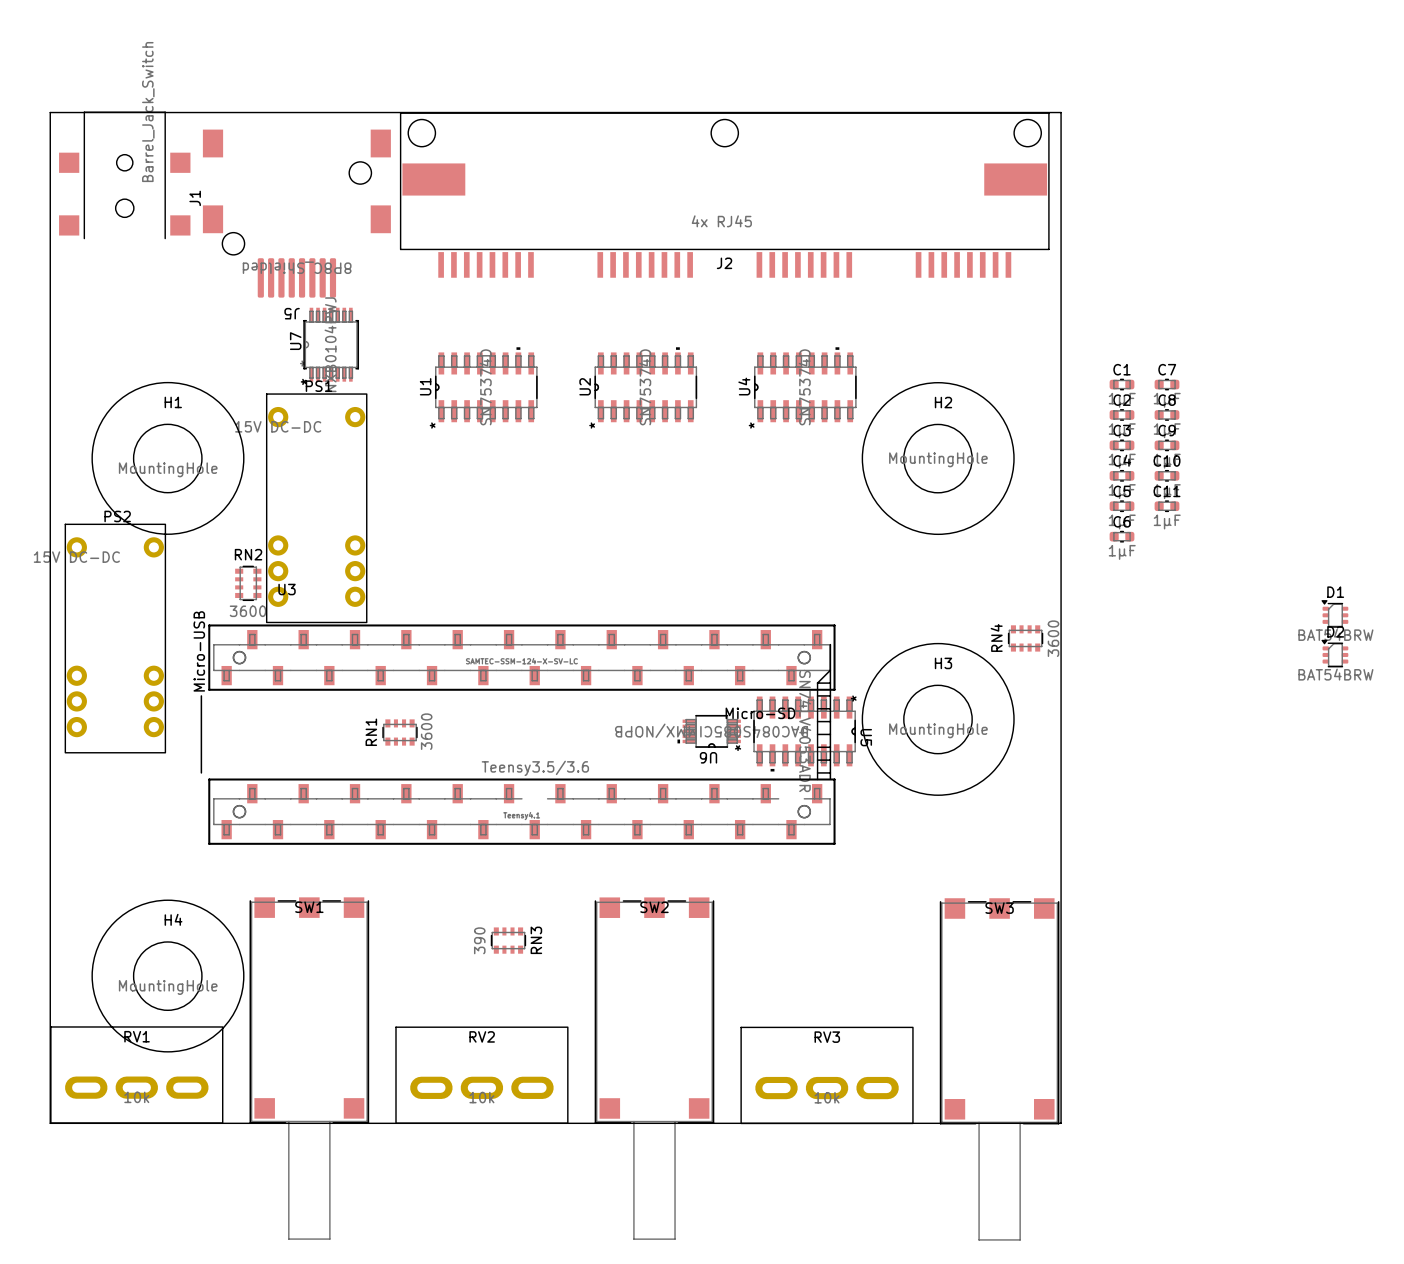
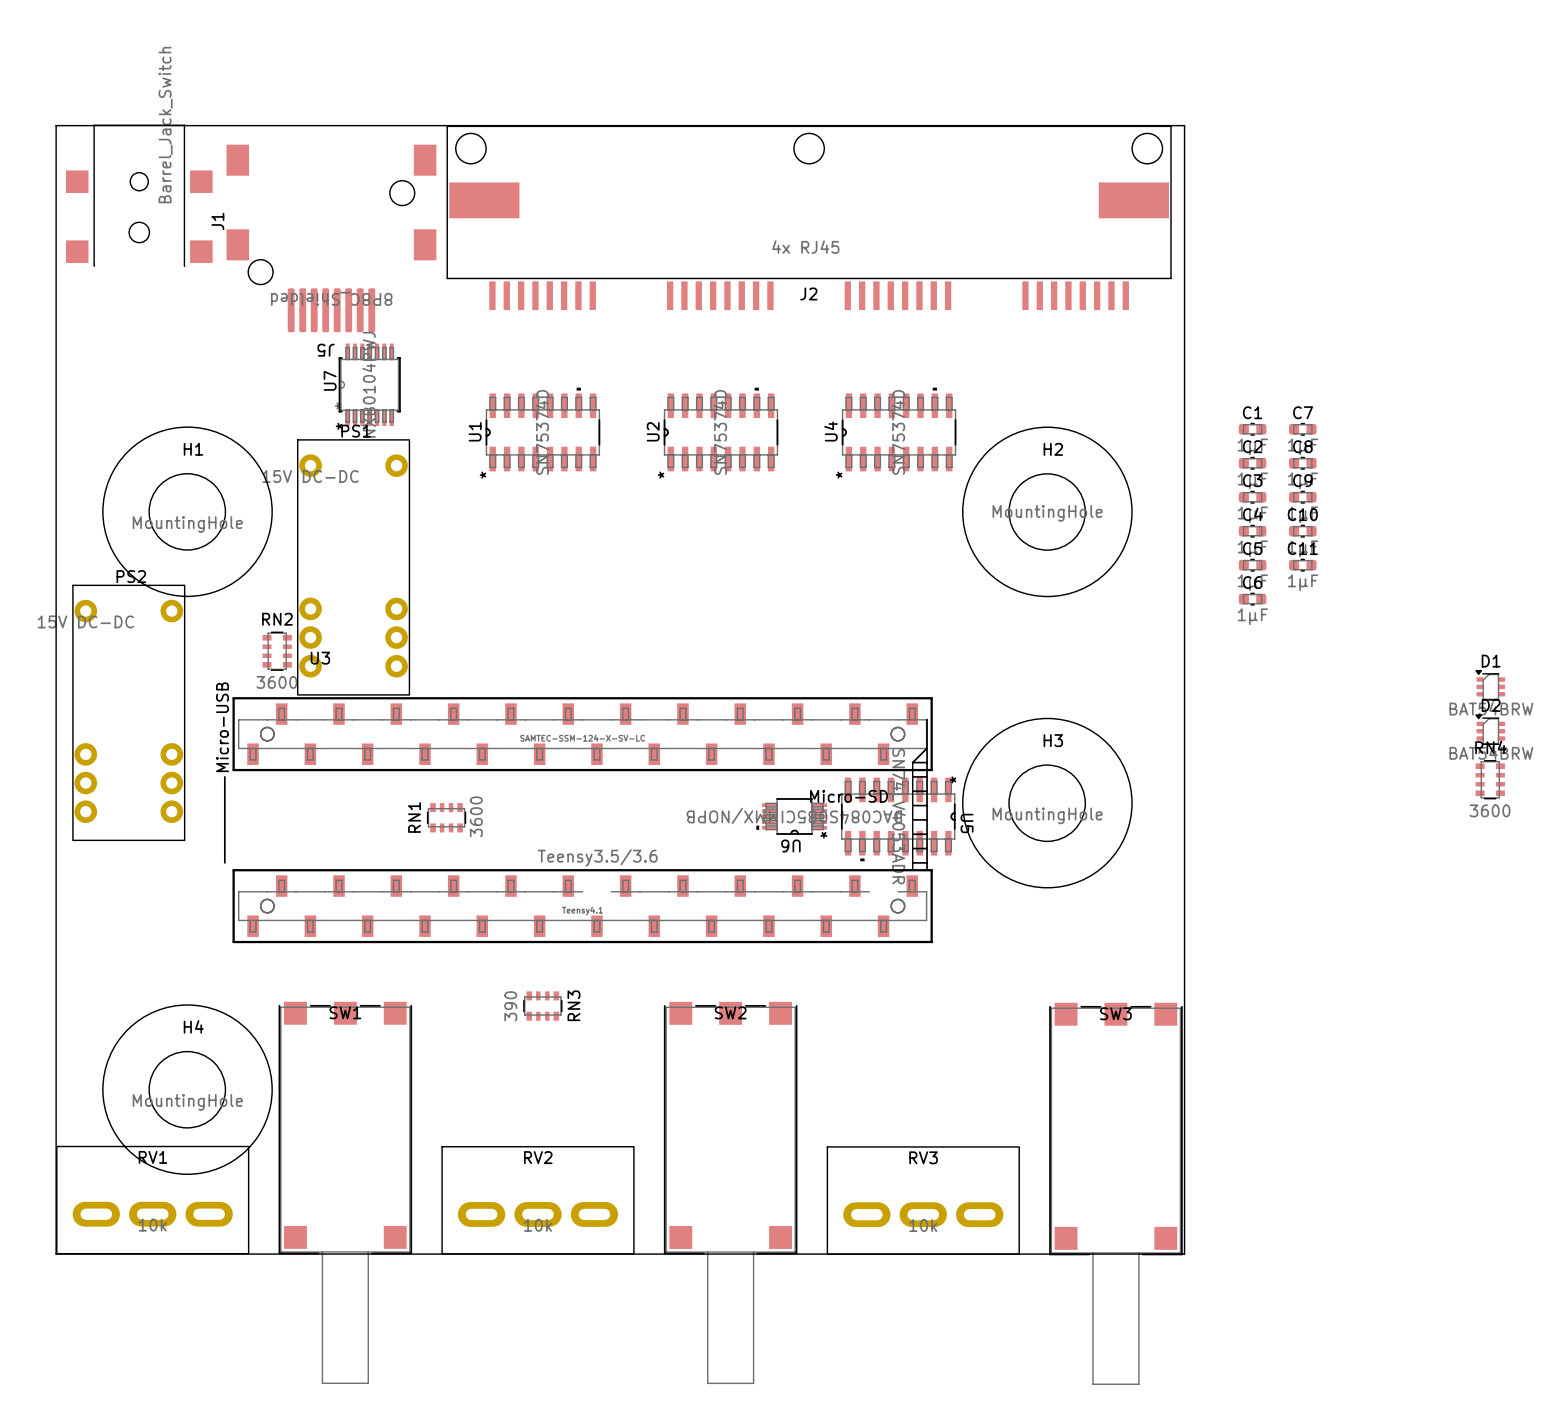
RN4 rotation: 0° (1025, 638) -> 90° clockwise (1490, 779)
RN4 position: (1025, 638) -> (1490, 779)
RN3 position: (508, 940) -> (542, 1006)

